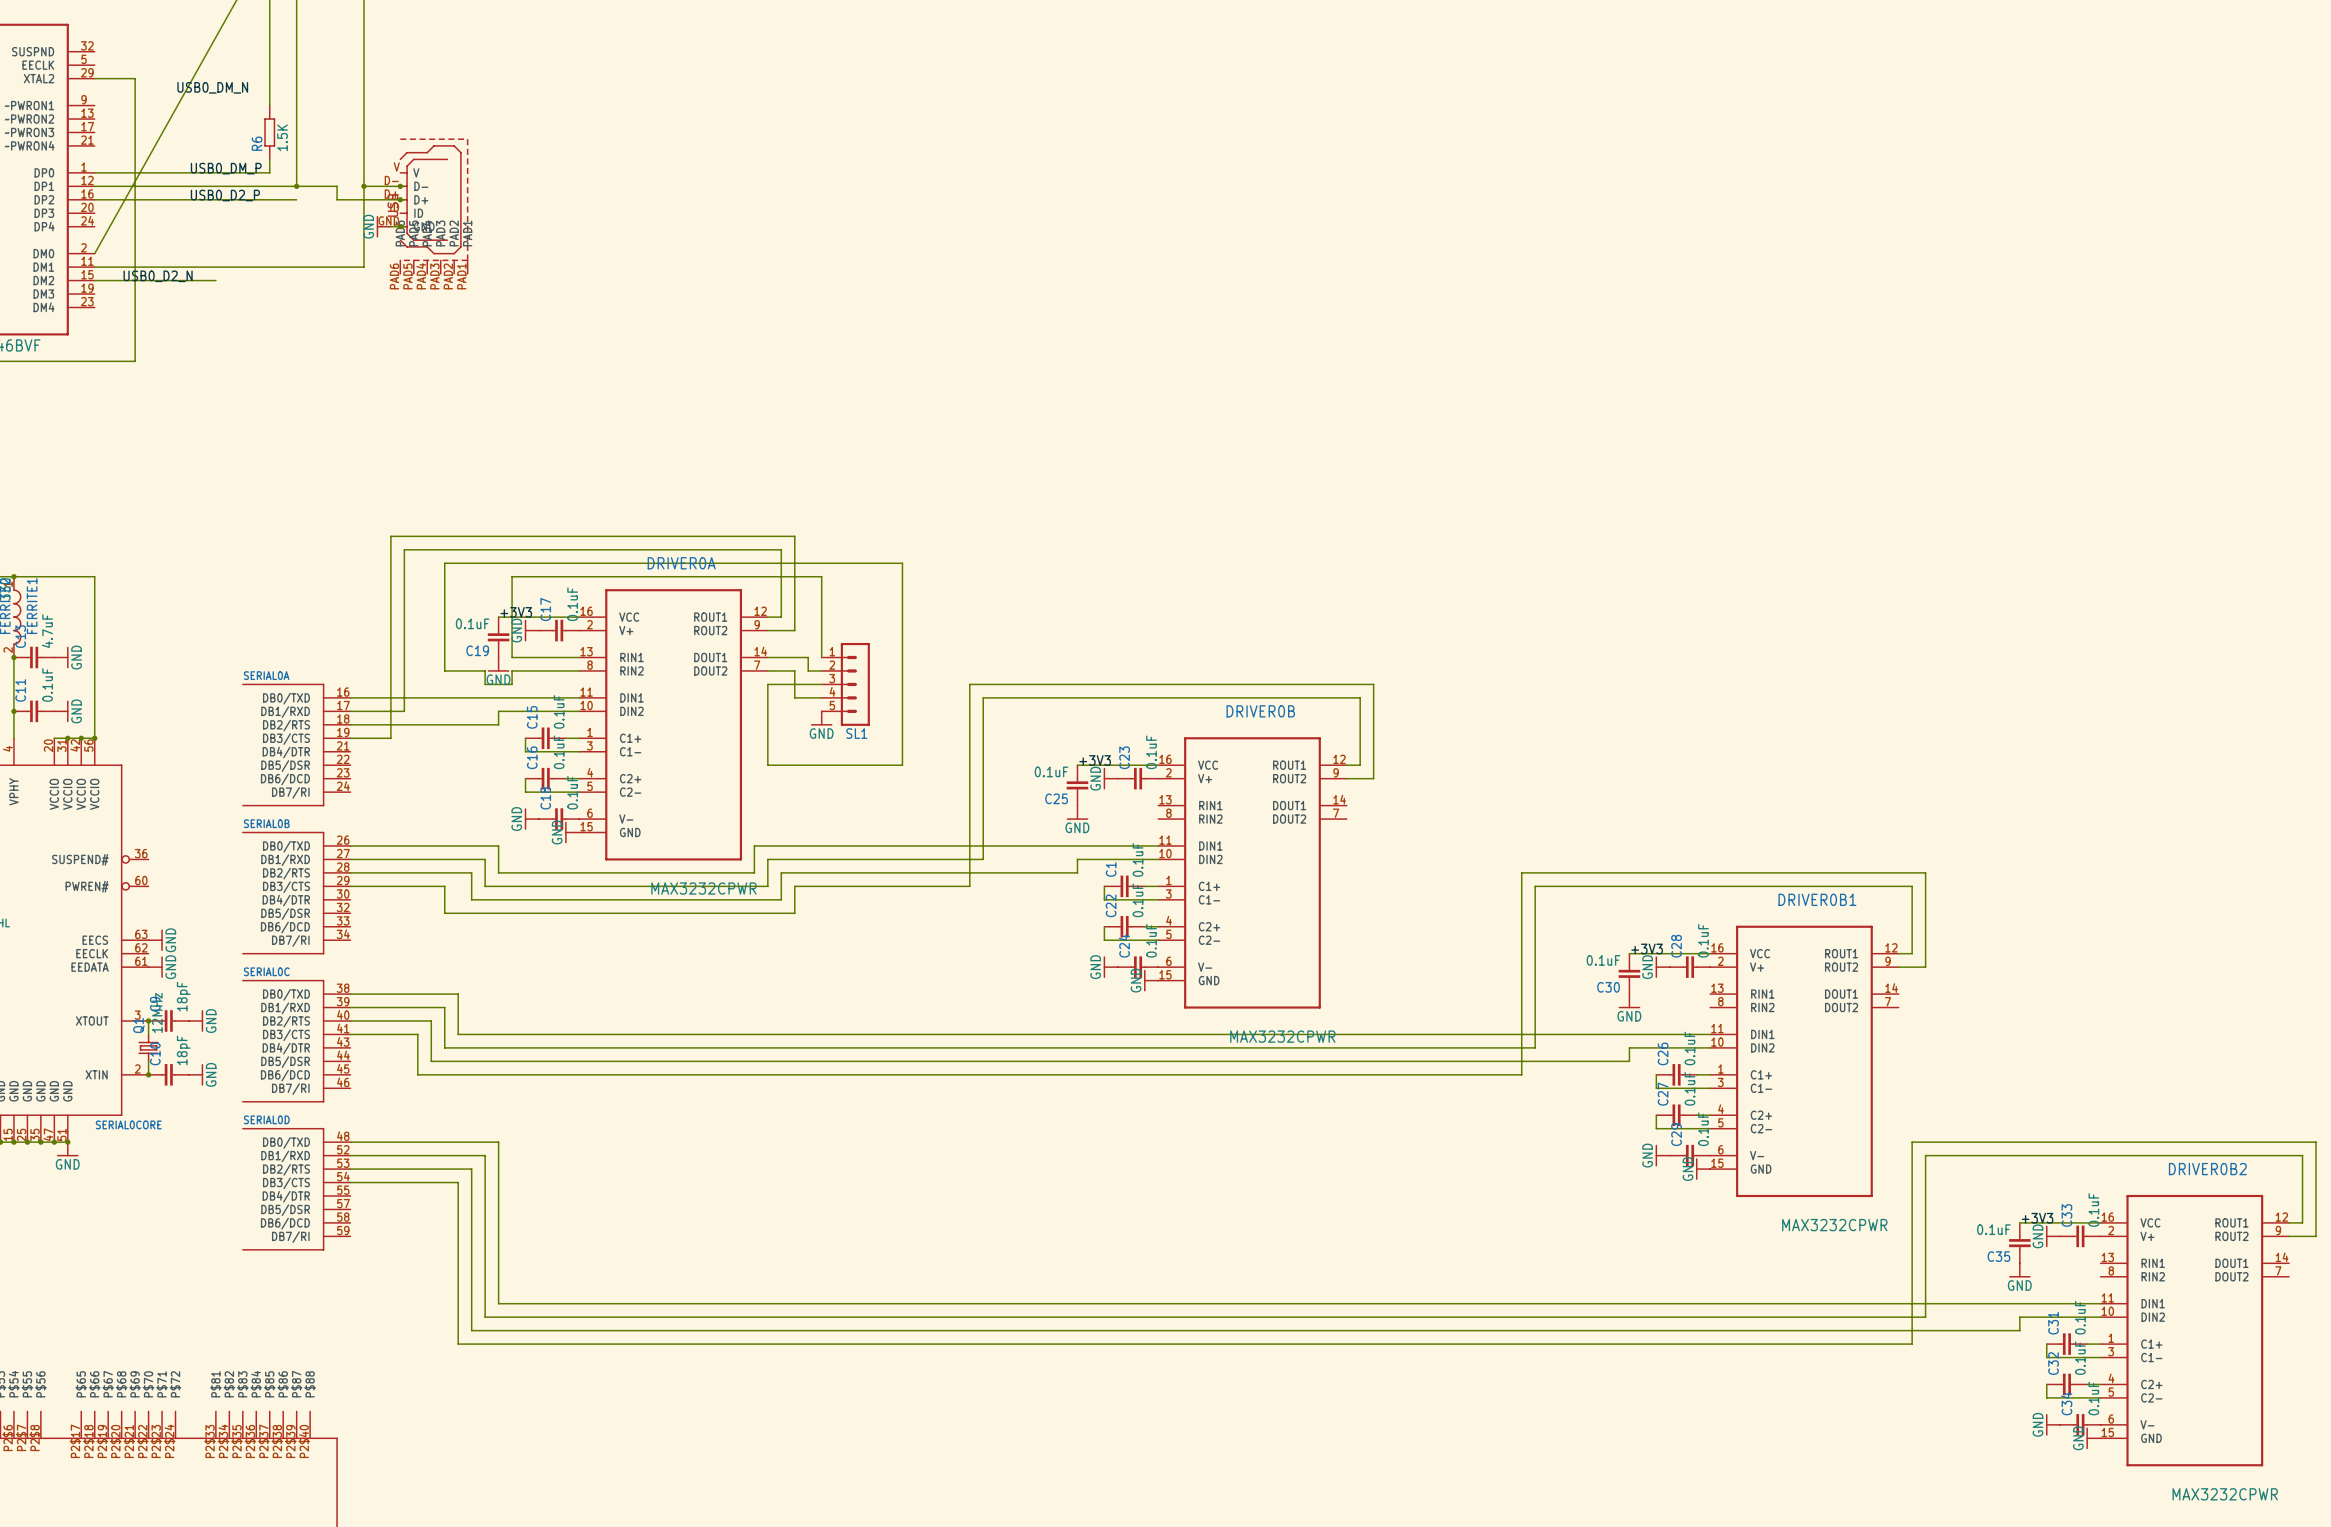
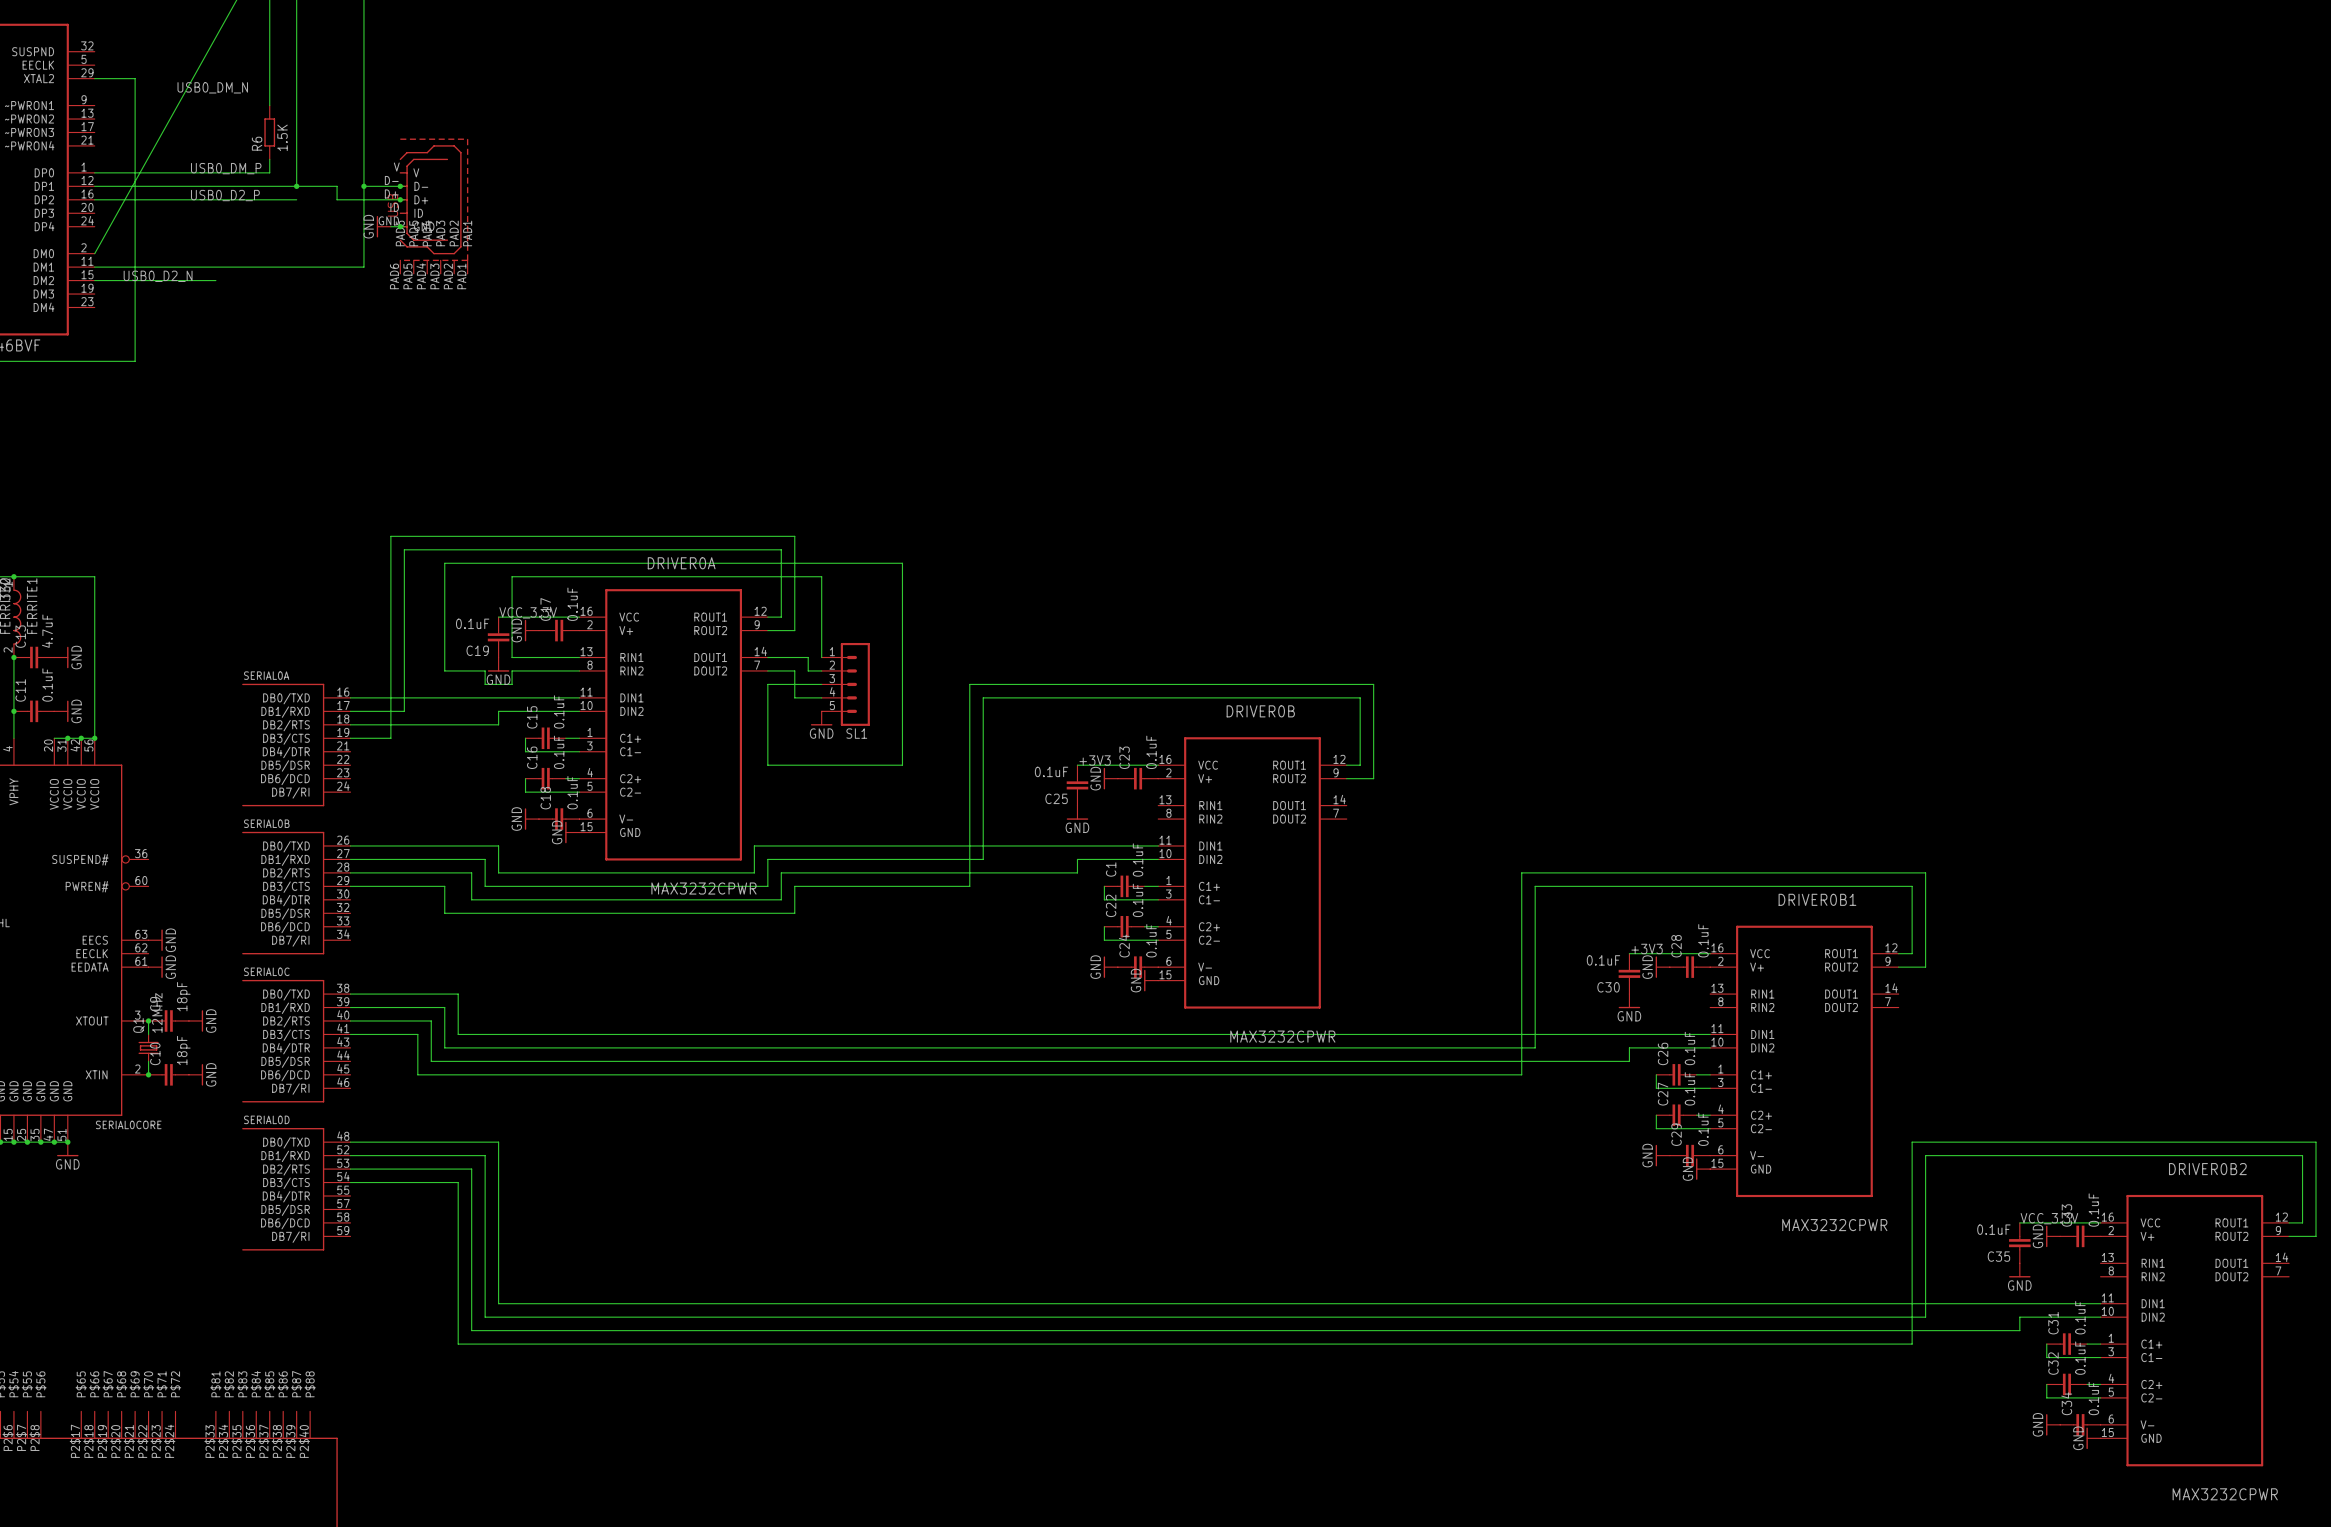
label: +3V3 (516, 612) -> VCC_3.3V (528, 612)
label: +3V3 (2037, 1218) -> VCC_3.3V (2049, 1218)

